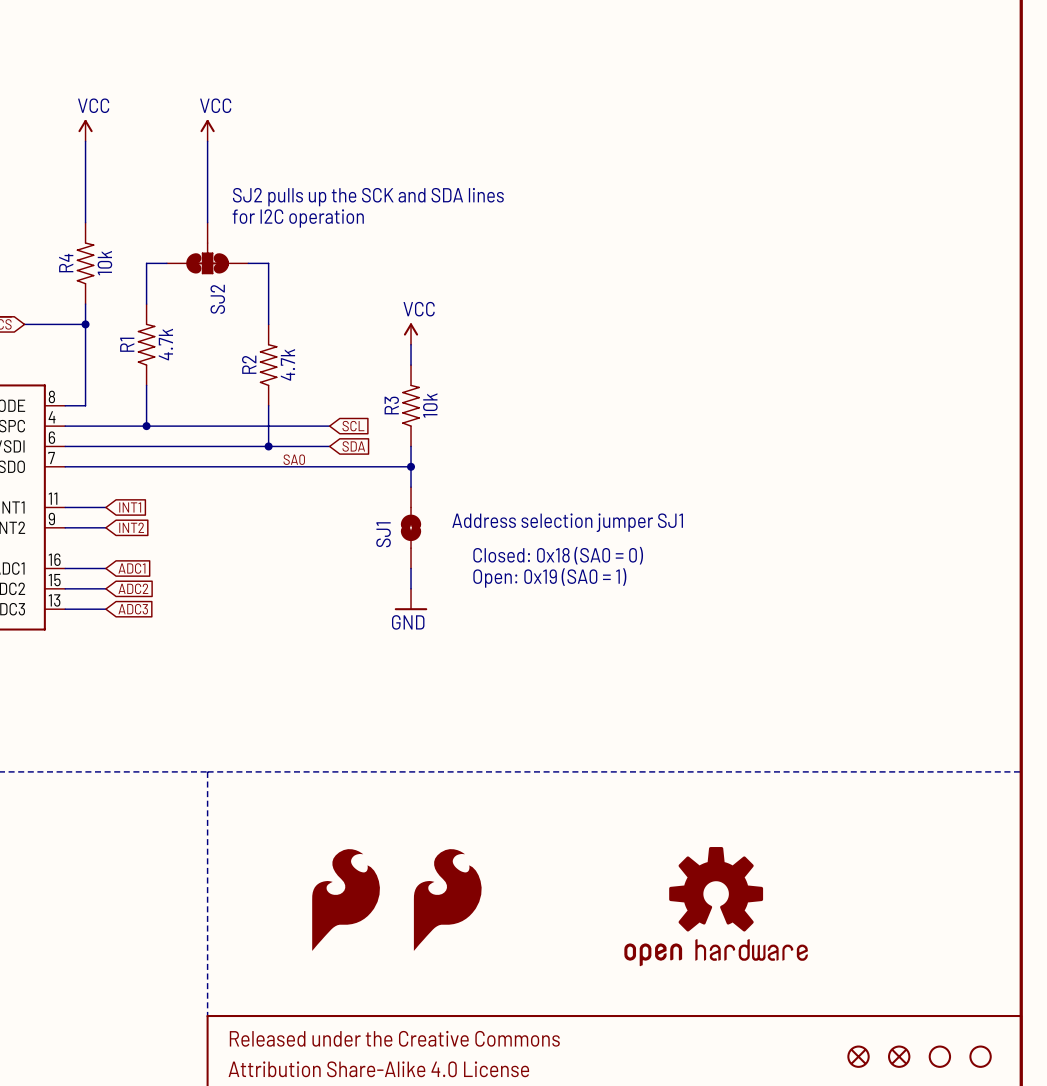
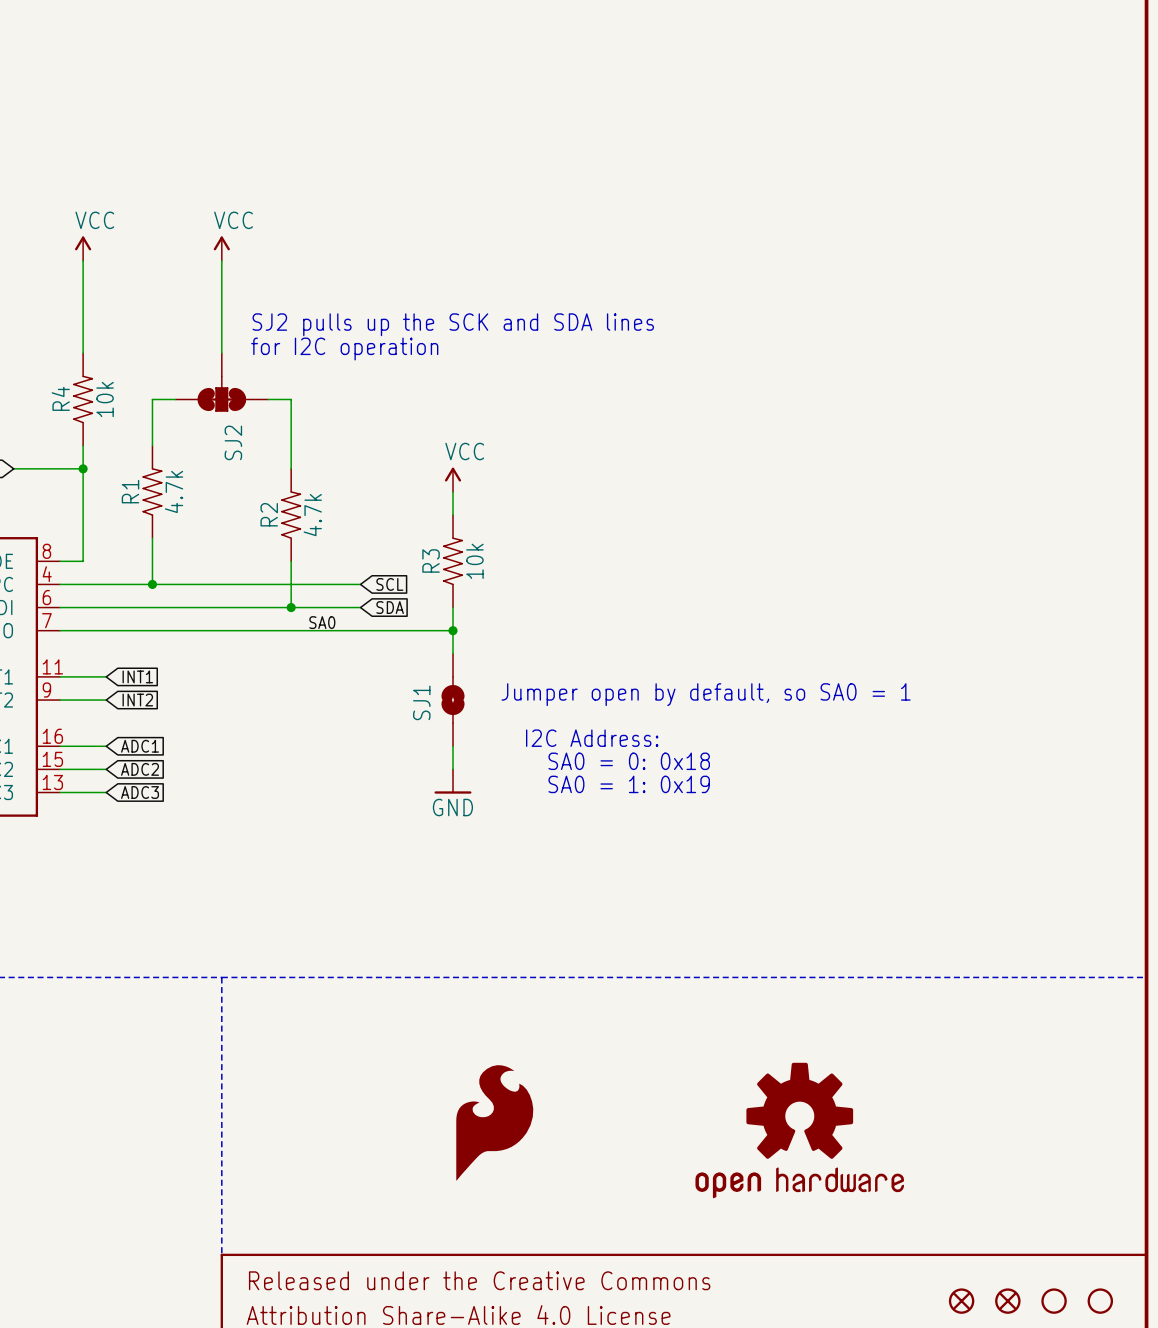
text: Address selection jumper SJ1 (567, 522) -> Jumper open by default, so SA0 = 1 (706, 694)
text: Closed: 0x18 (SA0 = 0) (558, 555) -> none
text: Open: 0x19 (SA0 = 1) (549, 577) -> I2C Address: (592, 738)
text: none -> SA0 = 0: 0x18 (629, 761)
text: none -> SA0 = 1: 0x19 (629, 784)
part: (346, 900) -> none

